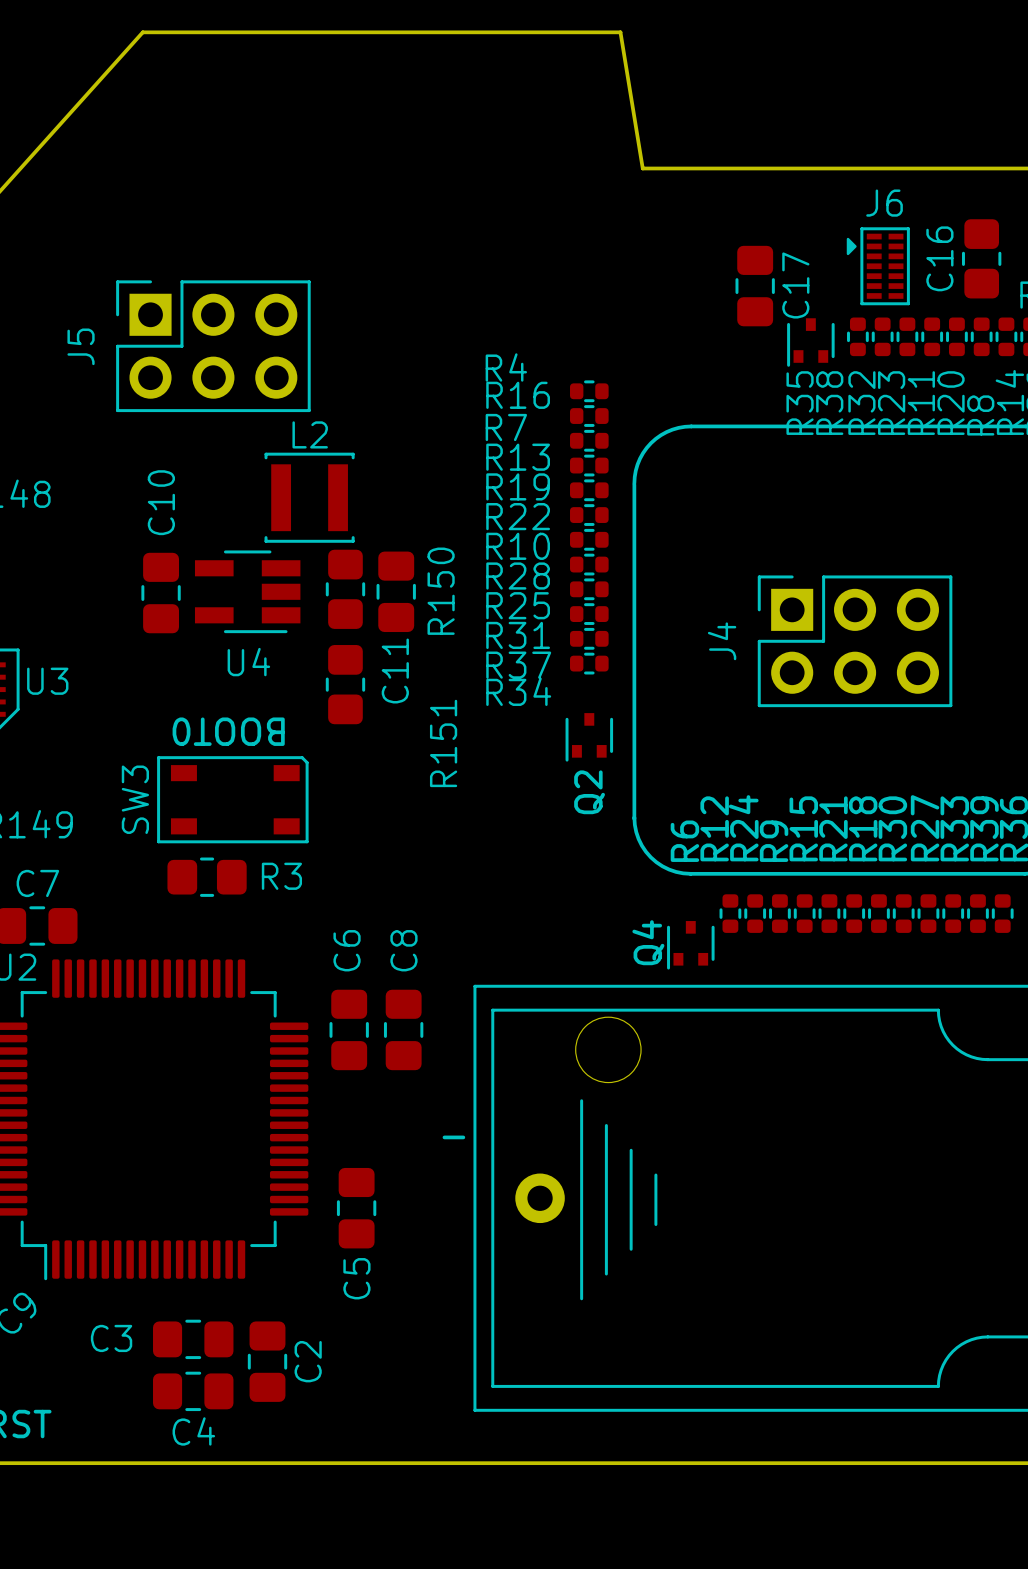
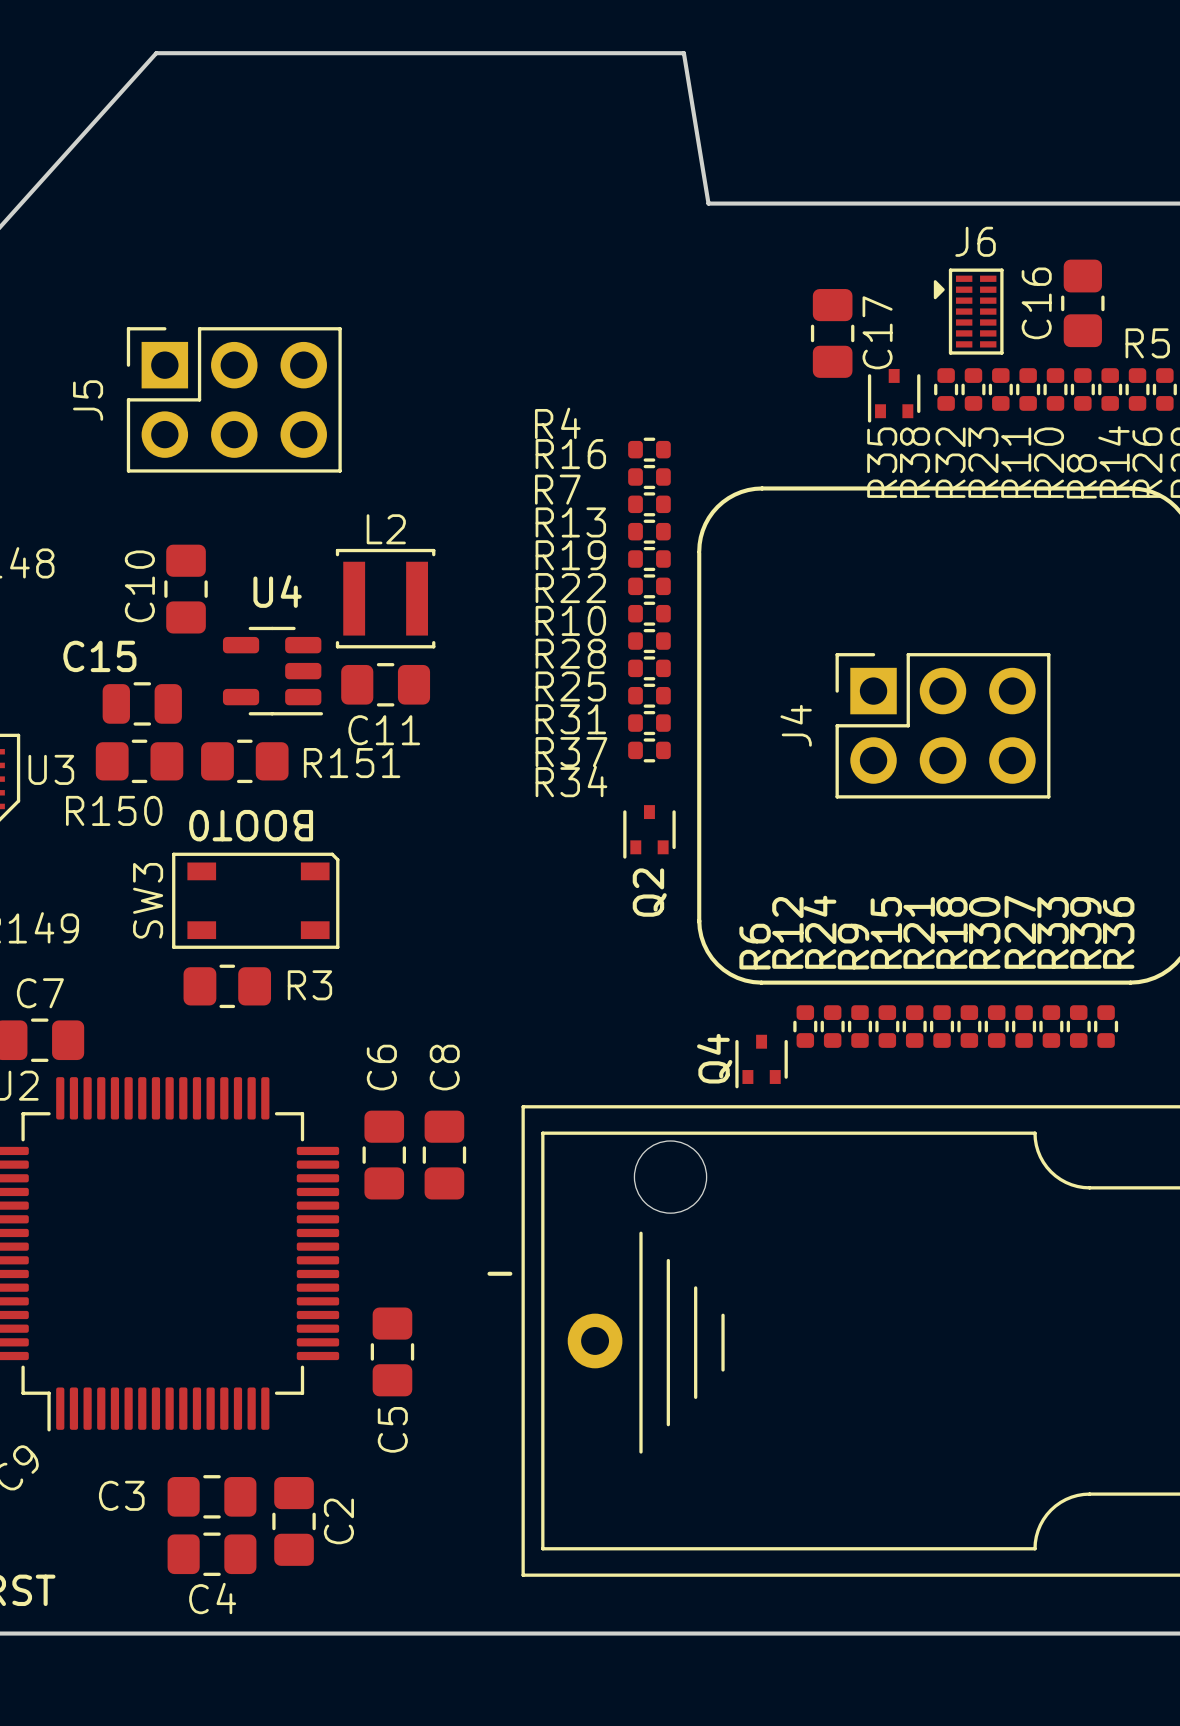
L2 position: (309, 497) -> (385, 598)
C10 name position: C10 (161, 502) -> C10 (139, 586)
U4 footprint: [194, 550, 301, 634] -> [222, 626, 324, 716]
R150 rotation: 0° (345, 589) -> 90° clockwise (139, 761)
R150 position: (345, 589) -> (139, 761)
C11 rotation: 0° (396, 591) -> 90° clockwise (385, 684)
R150 name position: R150 (441, 591) -> R150 (114, 810)
C10 position: (161, 593) -> (186, 589)
C15: none -> (142, 703)
U4 name position: U4 (248, 662) -> U4 (277, 591)
R151 rotation: 0° (345, 684) -> 90° clockwise (244, 761)
R151 position: (345, 684) -> (244, 761)
R151 name position: R151 (443, 743) -> R151 (352, 763)

